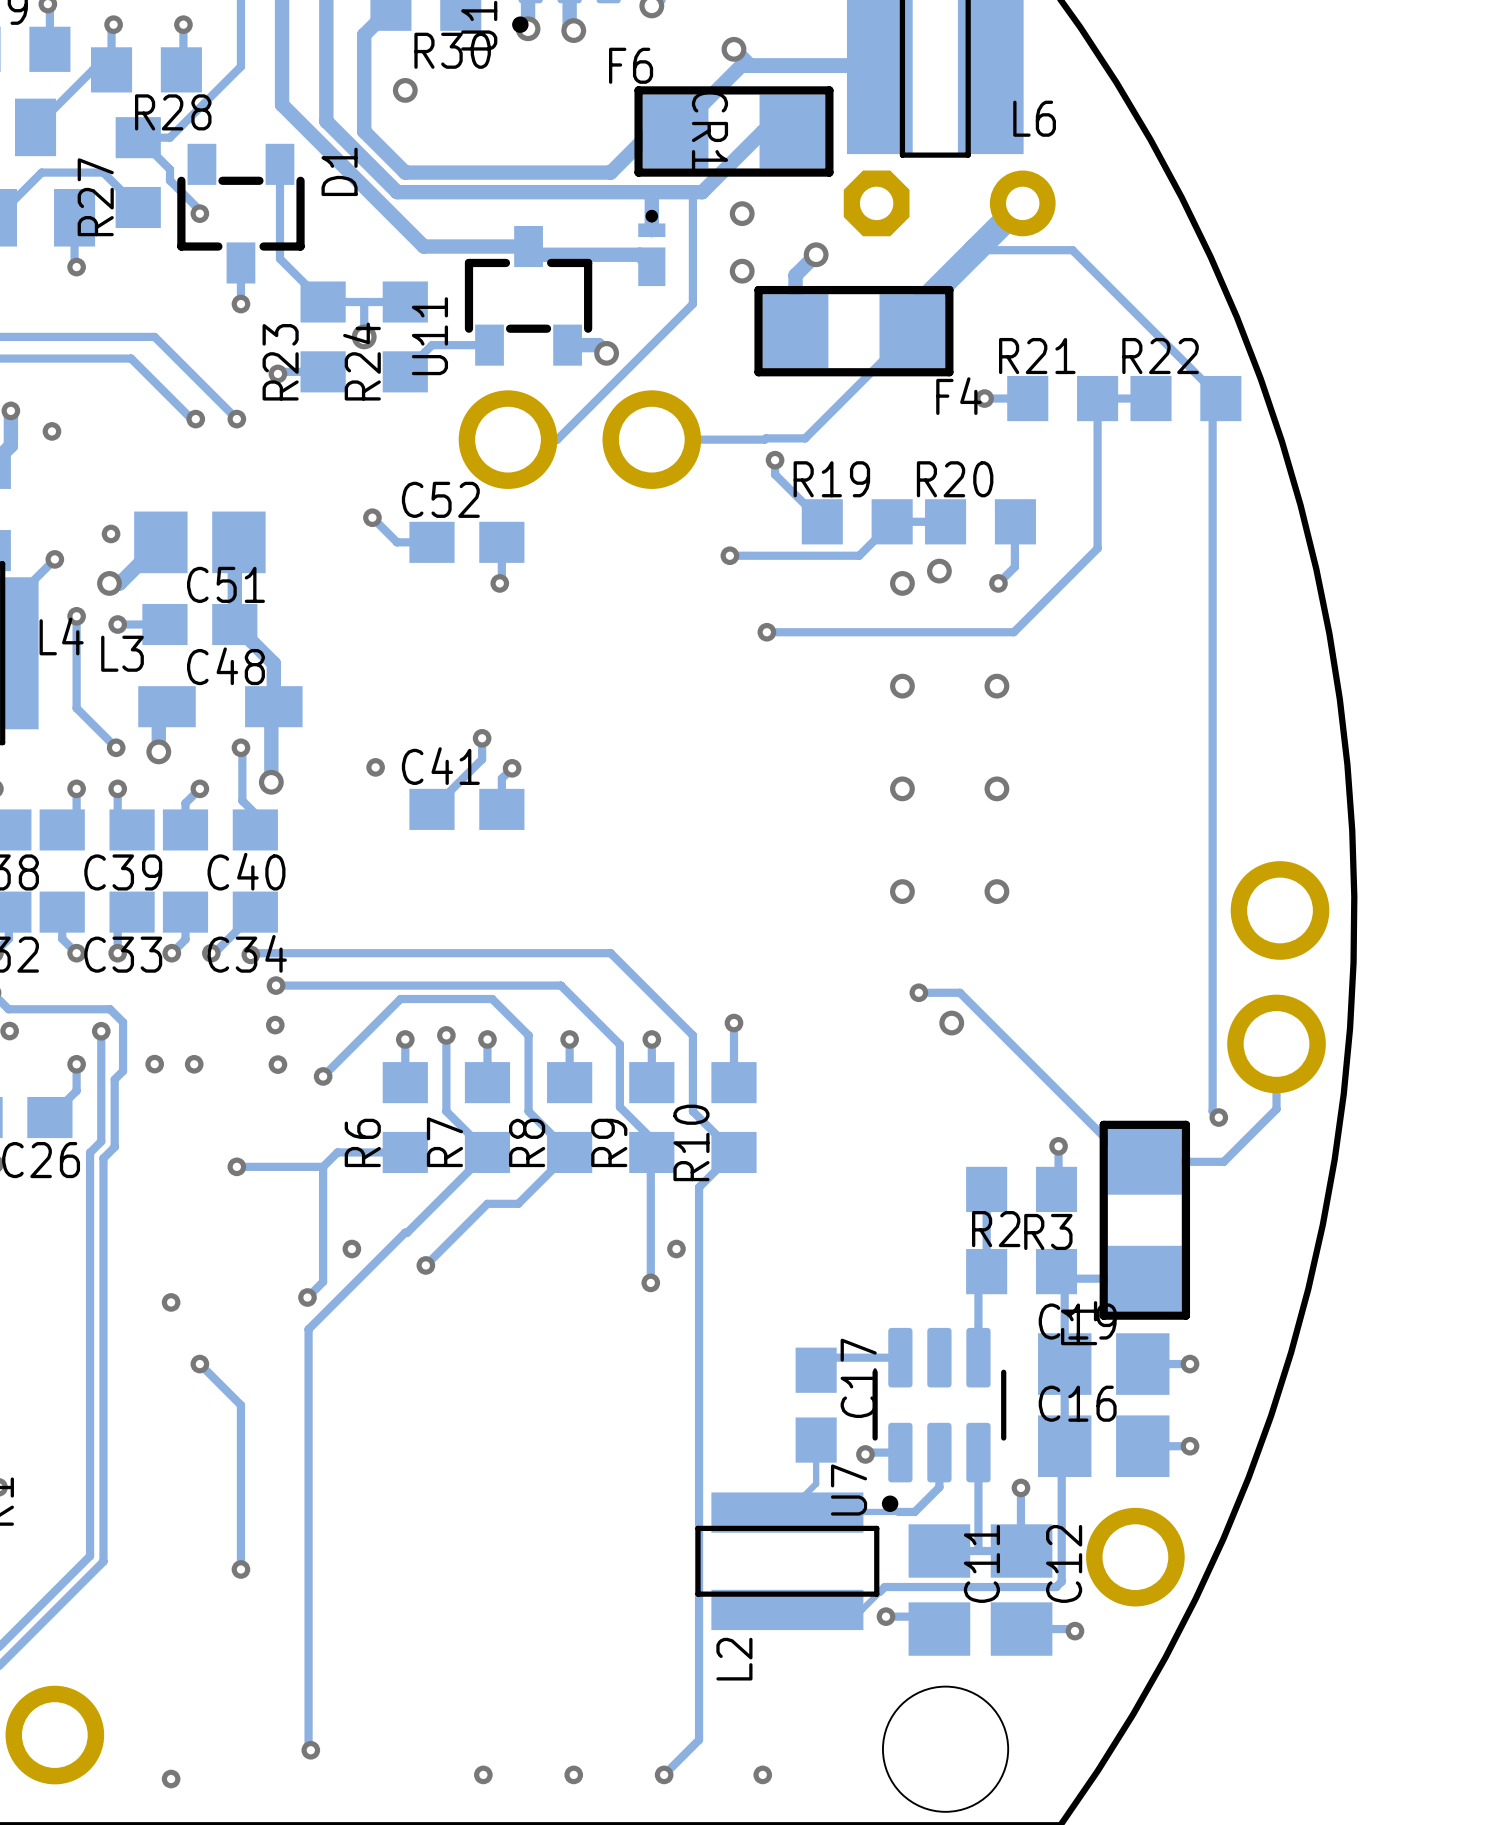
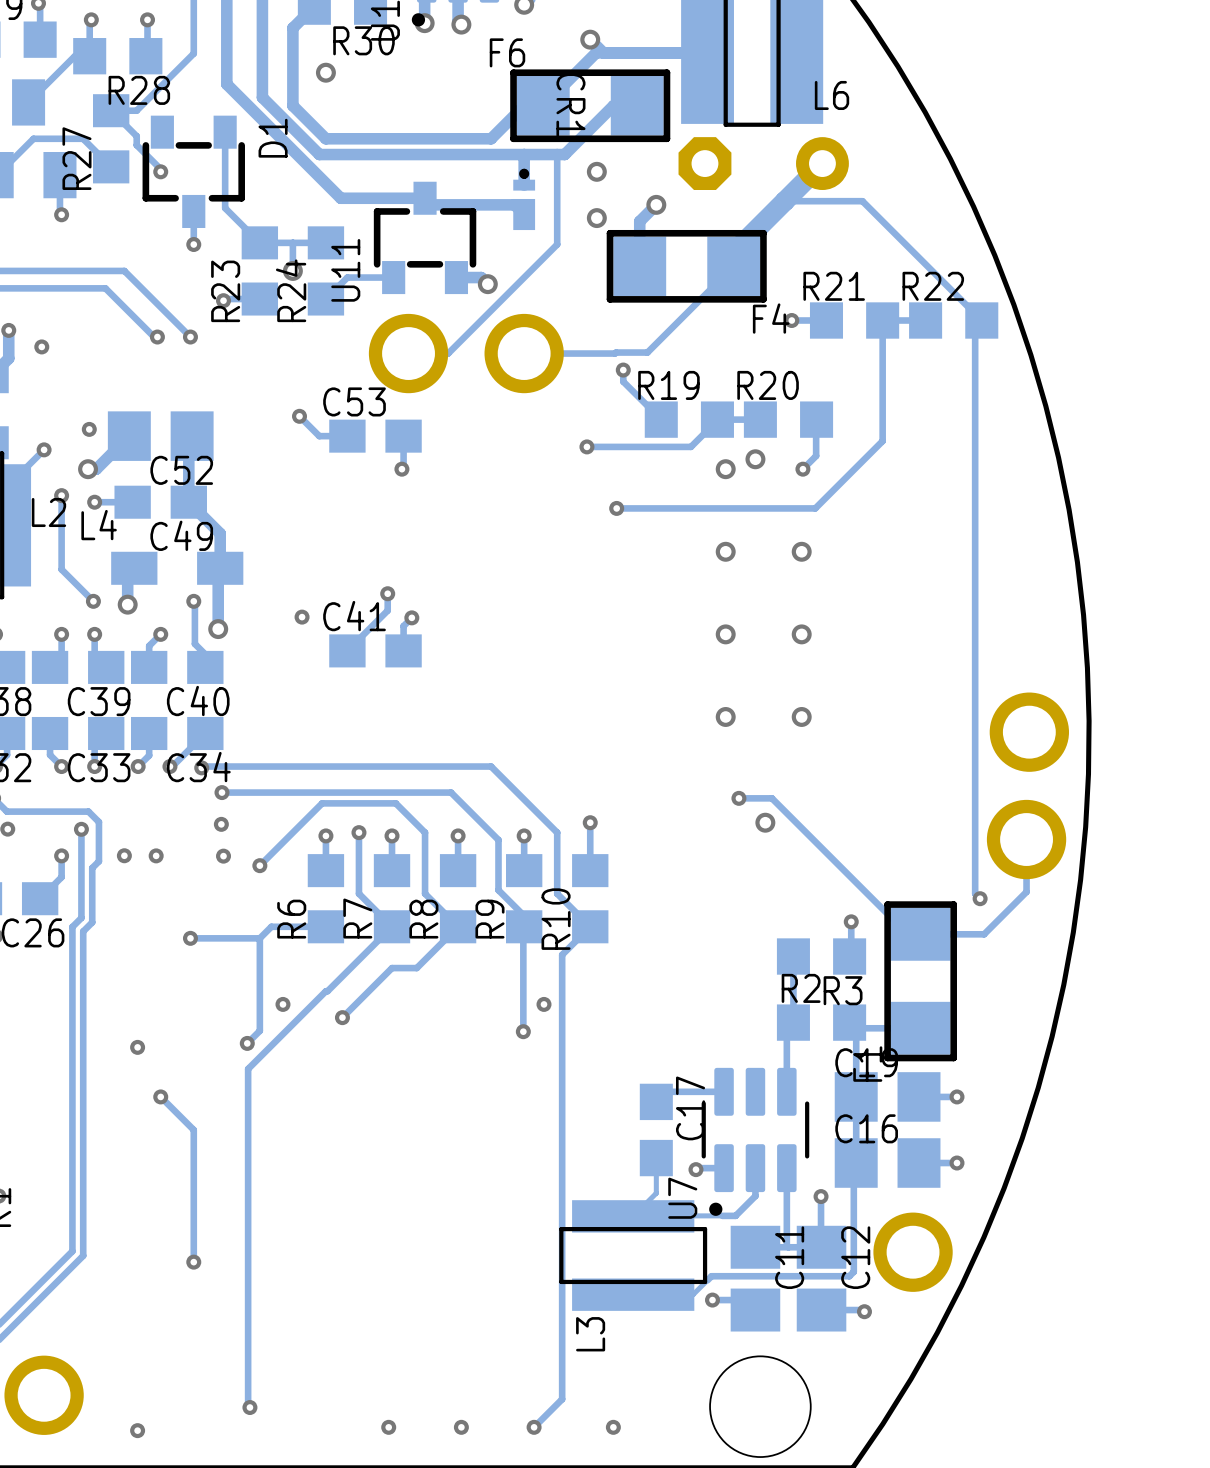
C52 name: C52 (440, 499) -> C53 (354, 401)
C51 name: C51 (225, 584) -> C52 (181, 470)
L4 name: L4 (61, 636) -> L2 (48, 512)
L3 name: L3 (122, 653) -> L4 (99, 525)
C48 name: C48 (225, 666) -> C49 (181, 535)
L2 name: L2 (734, 1659) -> L3 (590, 1334)

